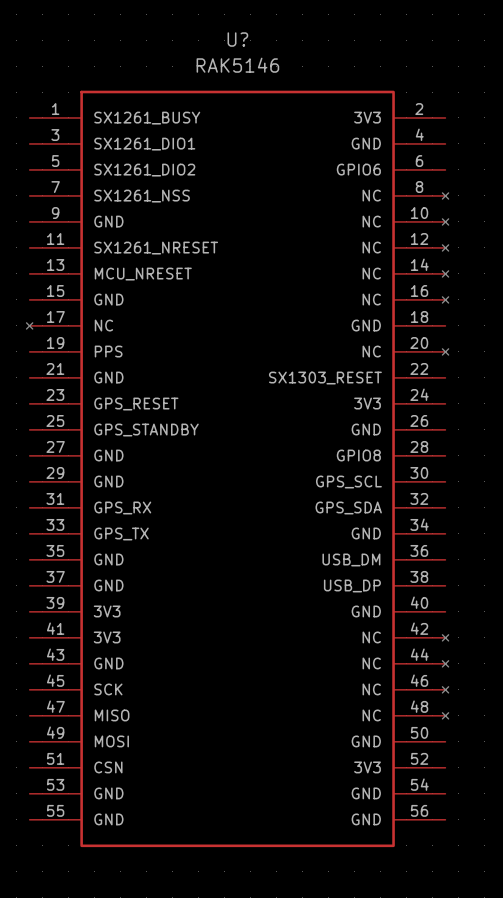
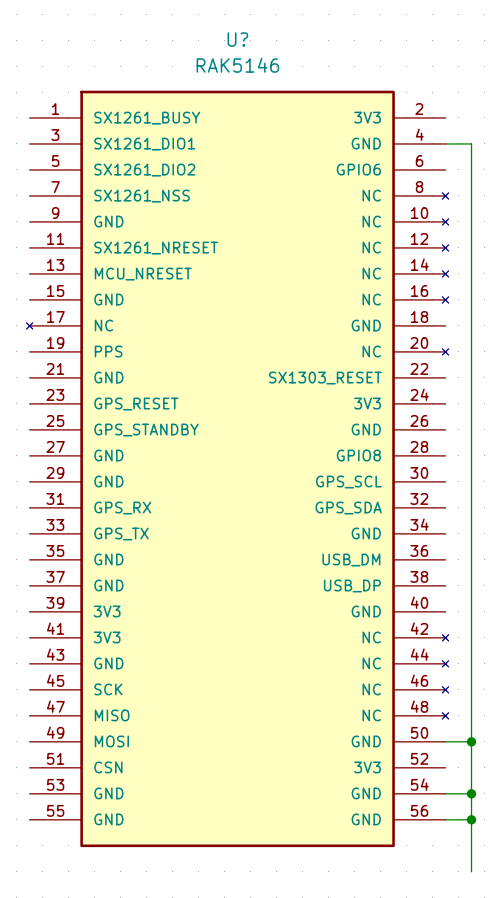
wire: none -> (445, 143) (471, 143) (471, 871)
wire: none -> (445, 741) (471, 741)
junction: none -> (471, 741)
wire: none -> (445, 793) (471, 793)
junction: none -> (471, 793)
wire: none -> (445, 819) (471, 819)
junction: none -> (471, 819)

